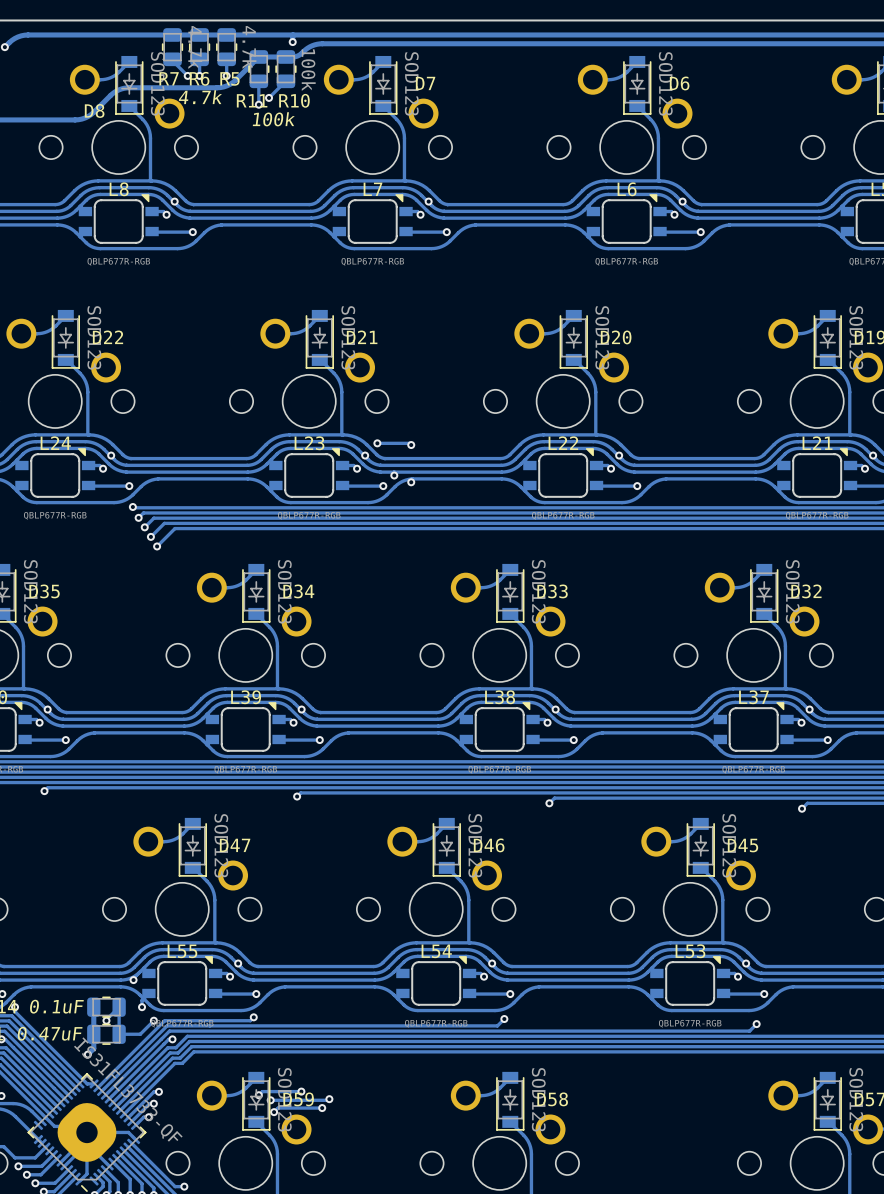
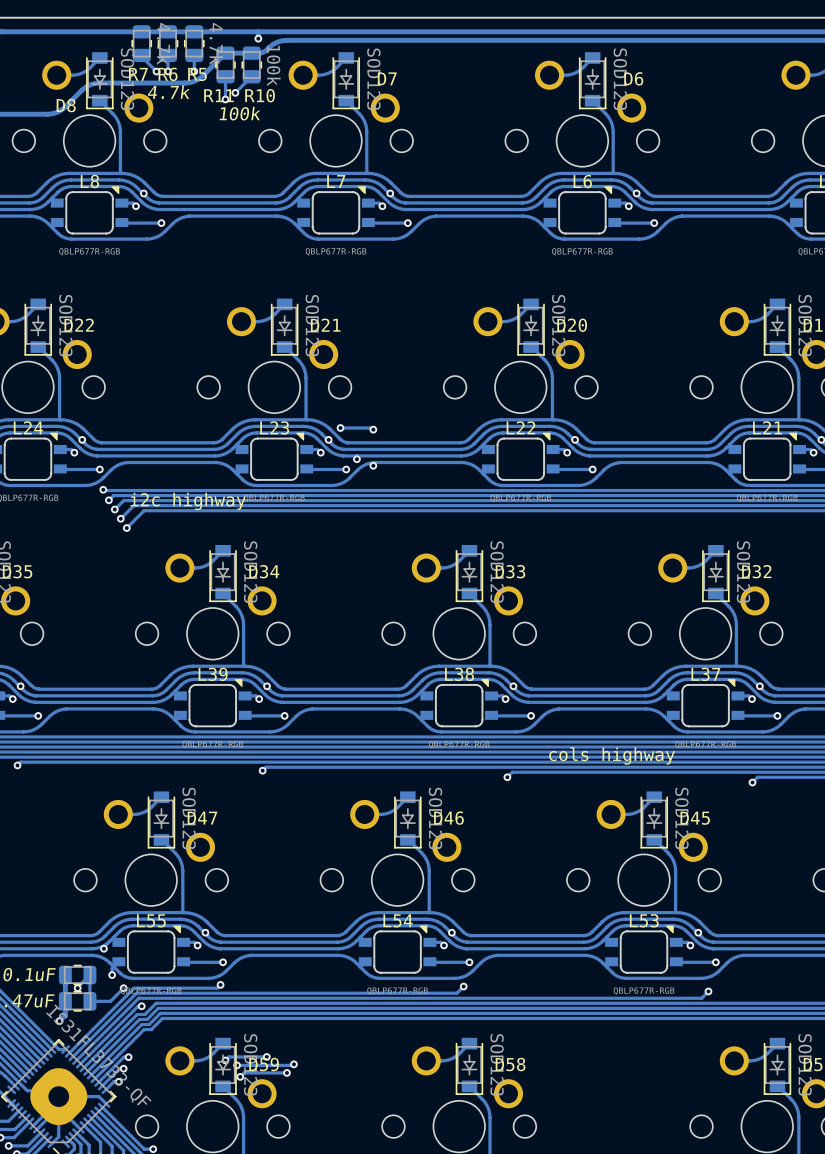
text: none -> i2c highway (188, 501)
text: none -> cols highway (612, 756)

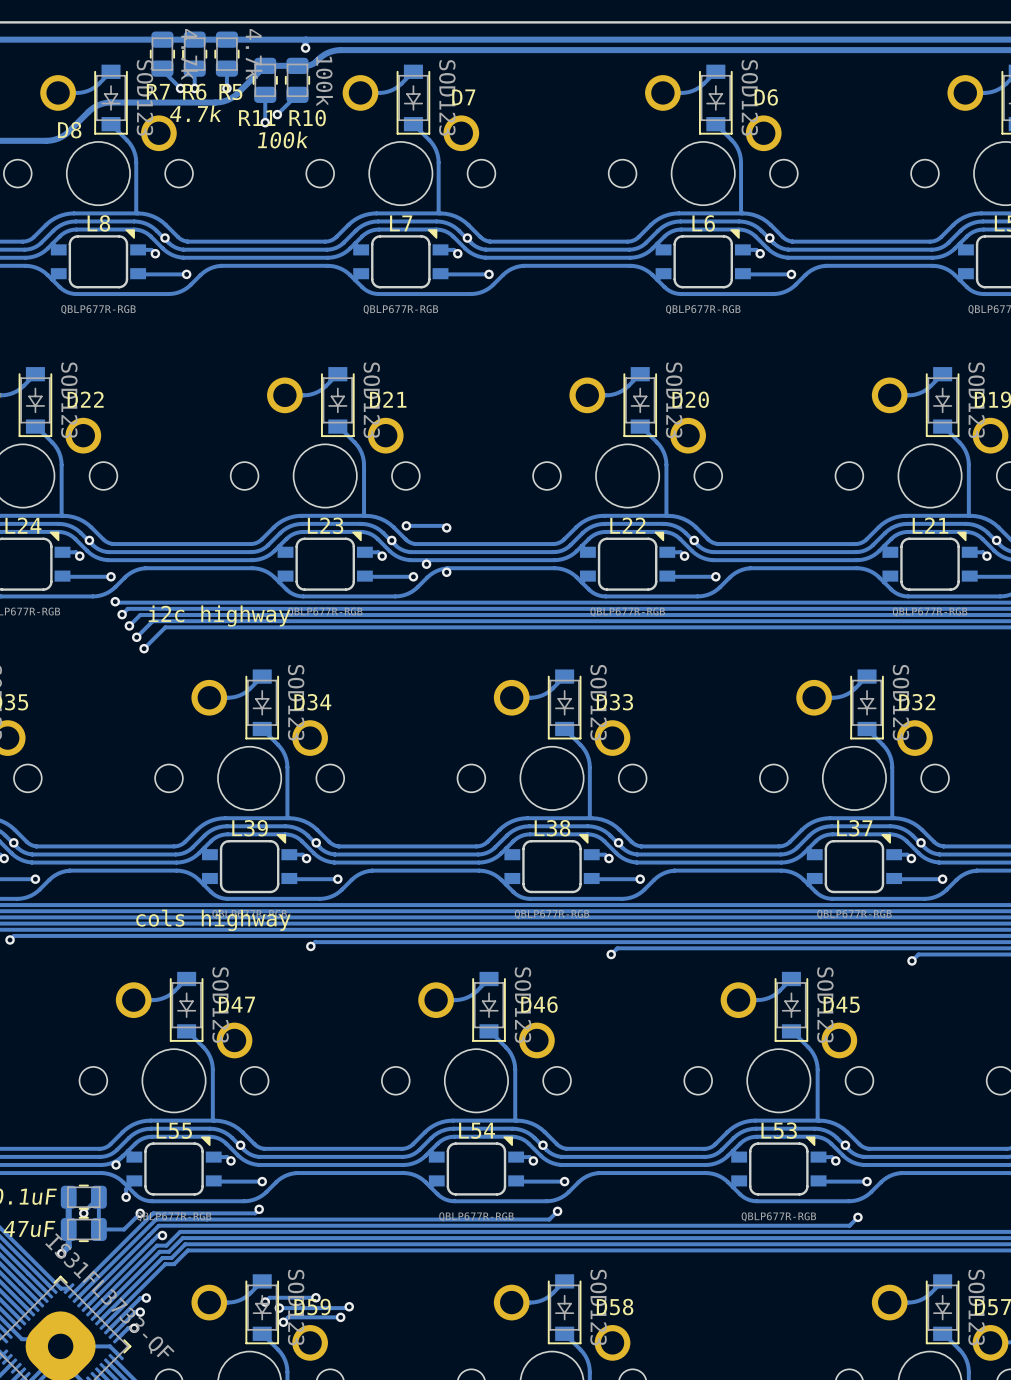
text: none -> cols highway (213, 920)
text: cols highway (612, 756) -> none

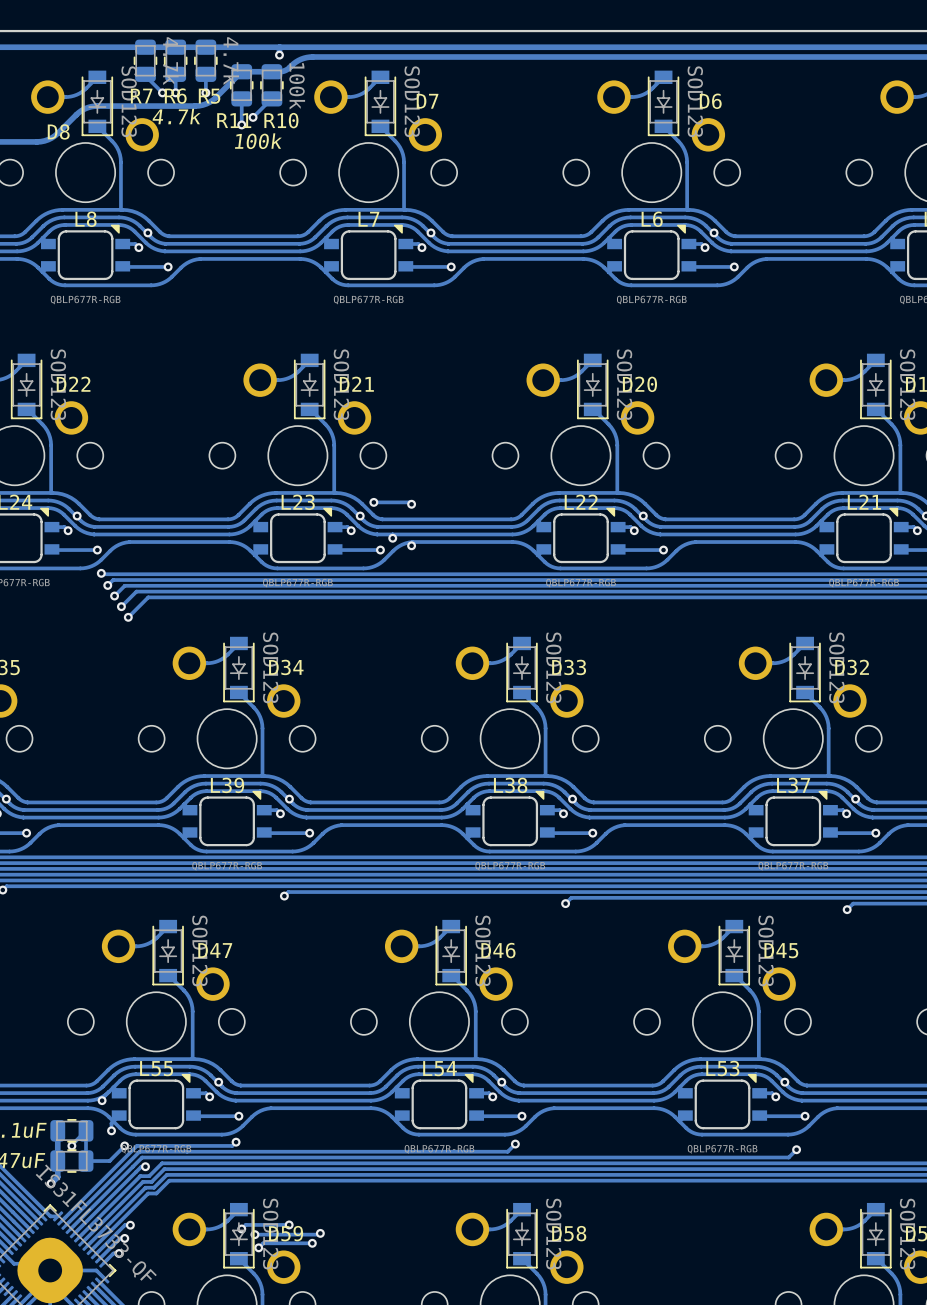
text: i2c highway (219, 616) -> none
text: cols highway (213, 920) -> none

